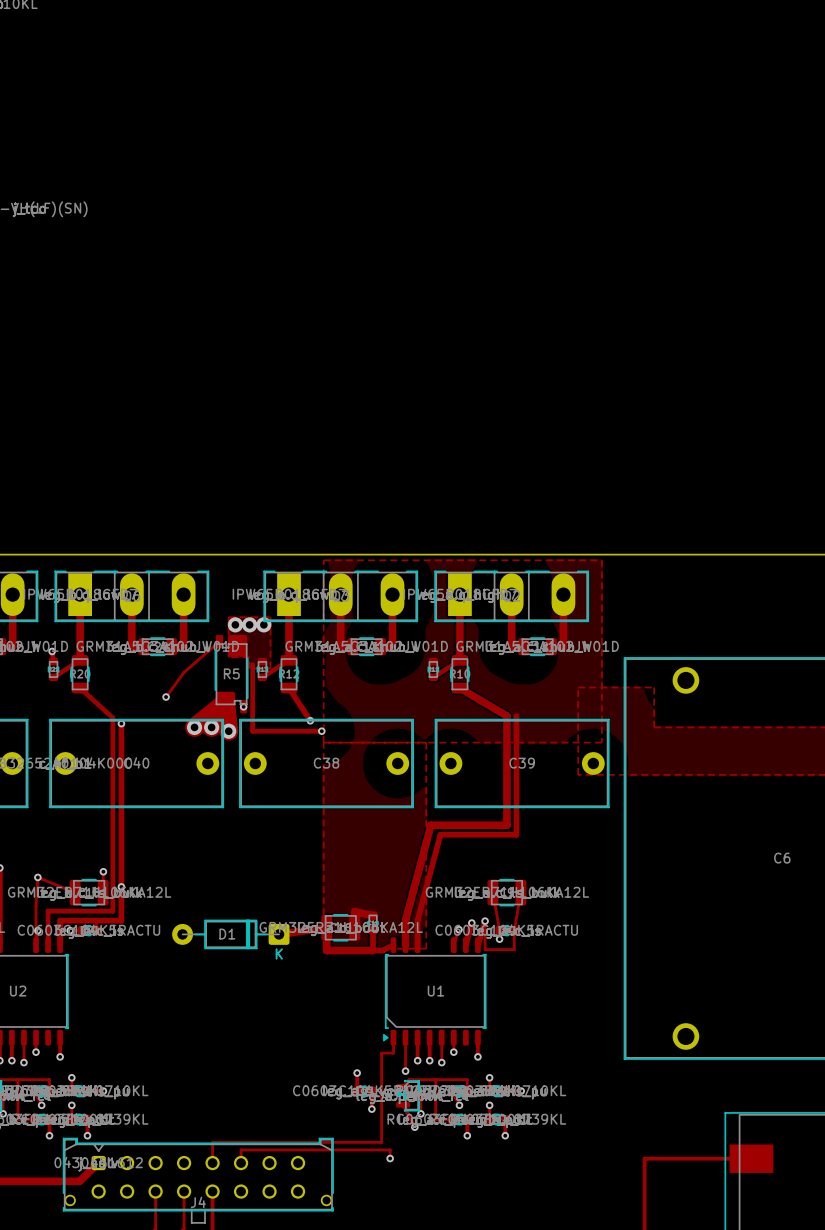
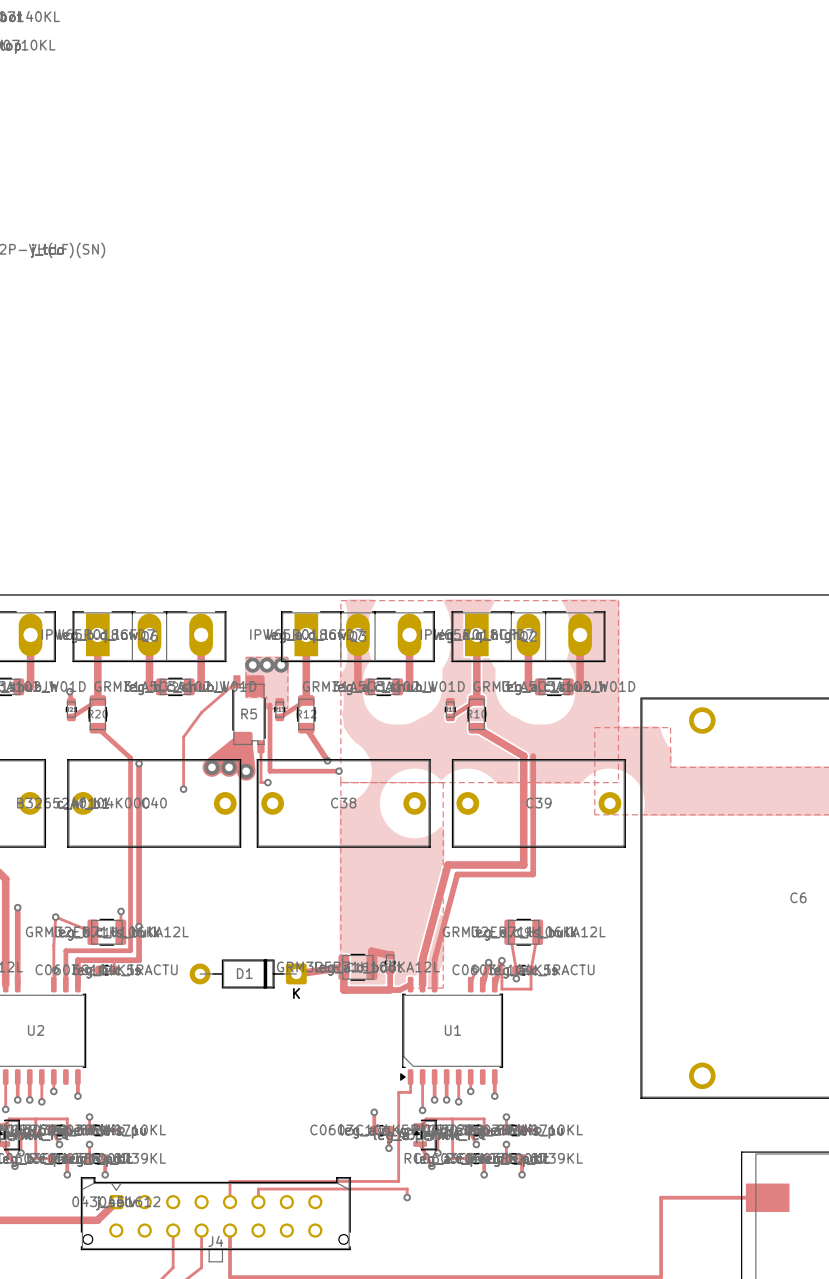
track: none -> (183, 737) (183, 789)
via: (166, 697) -> none
track: none -> (261, 746) (261, 782) (267, 782)
via position: (243, 706) -> (267, 782)
via: none -> (183, 789)

